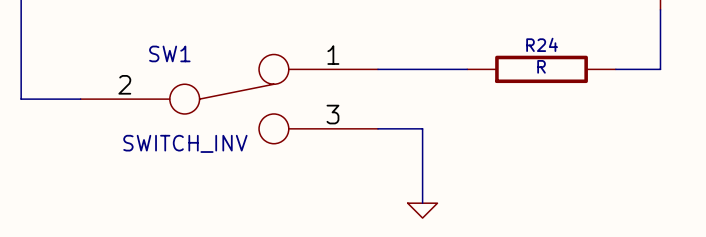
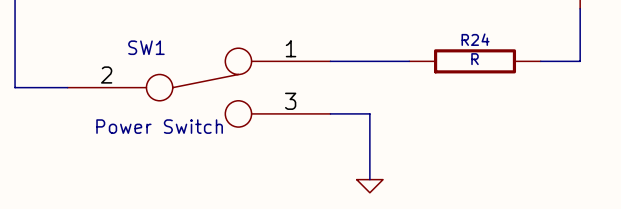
SW1 value: SWITCH_INV (185, 143) -> Power Switch (159, 126)

